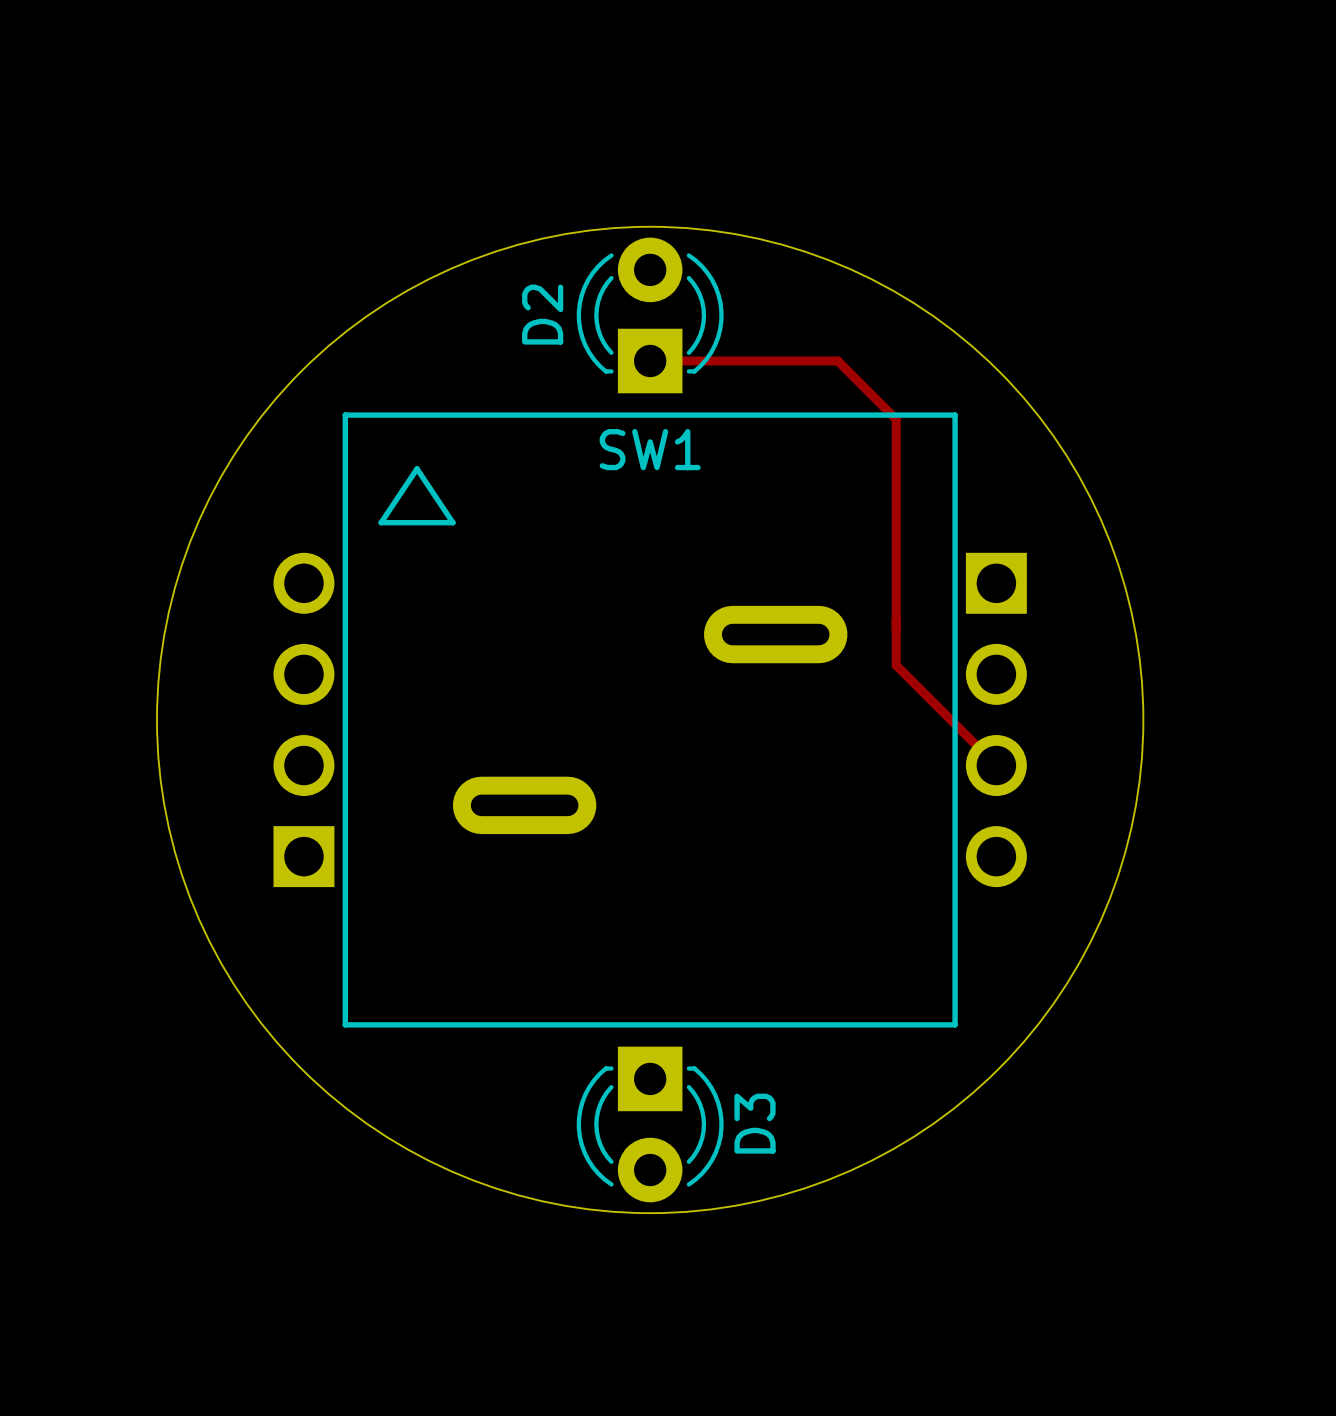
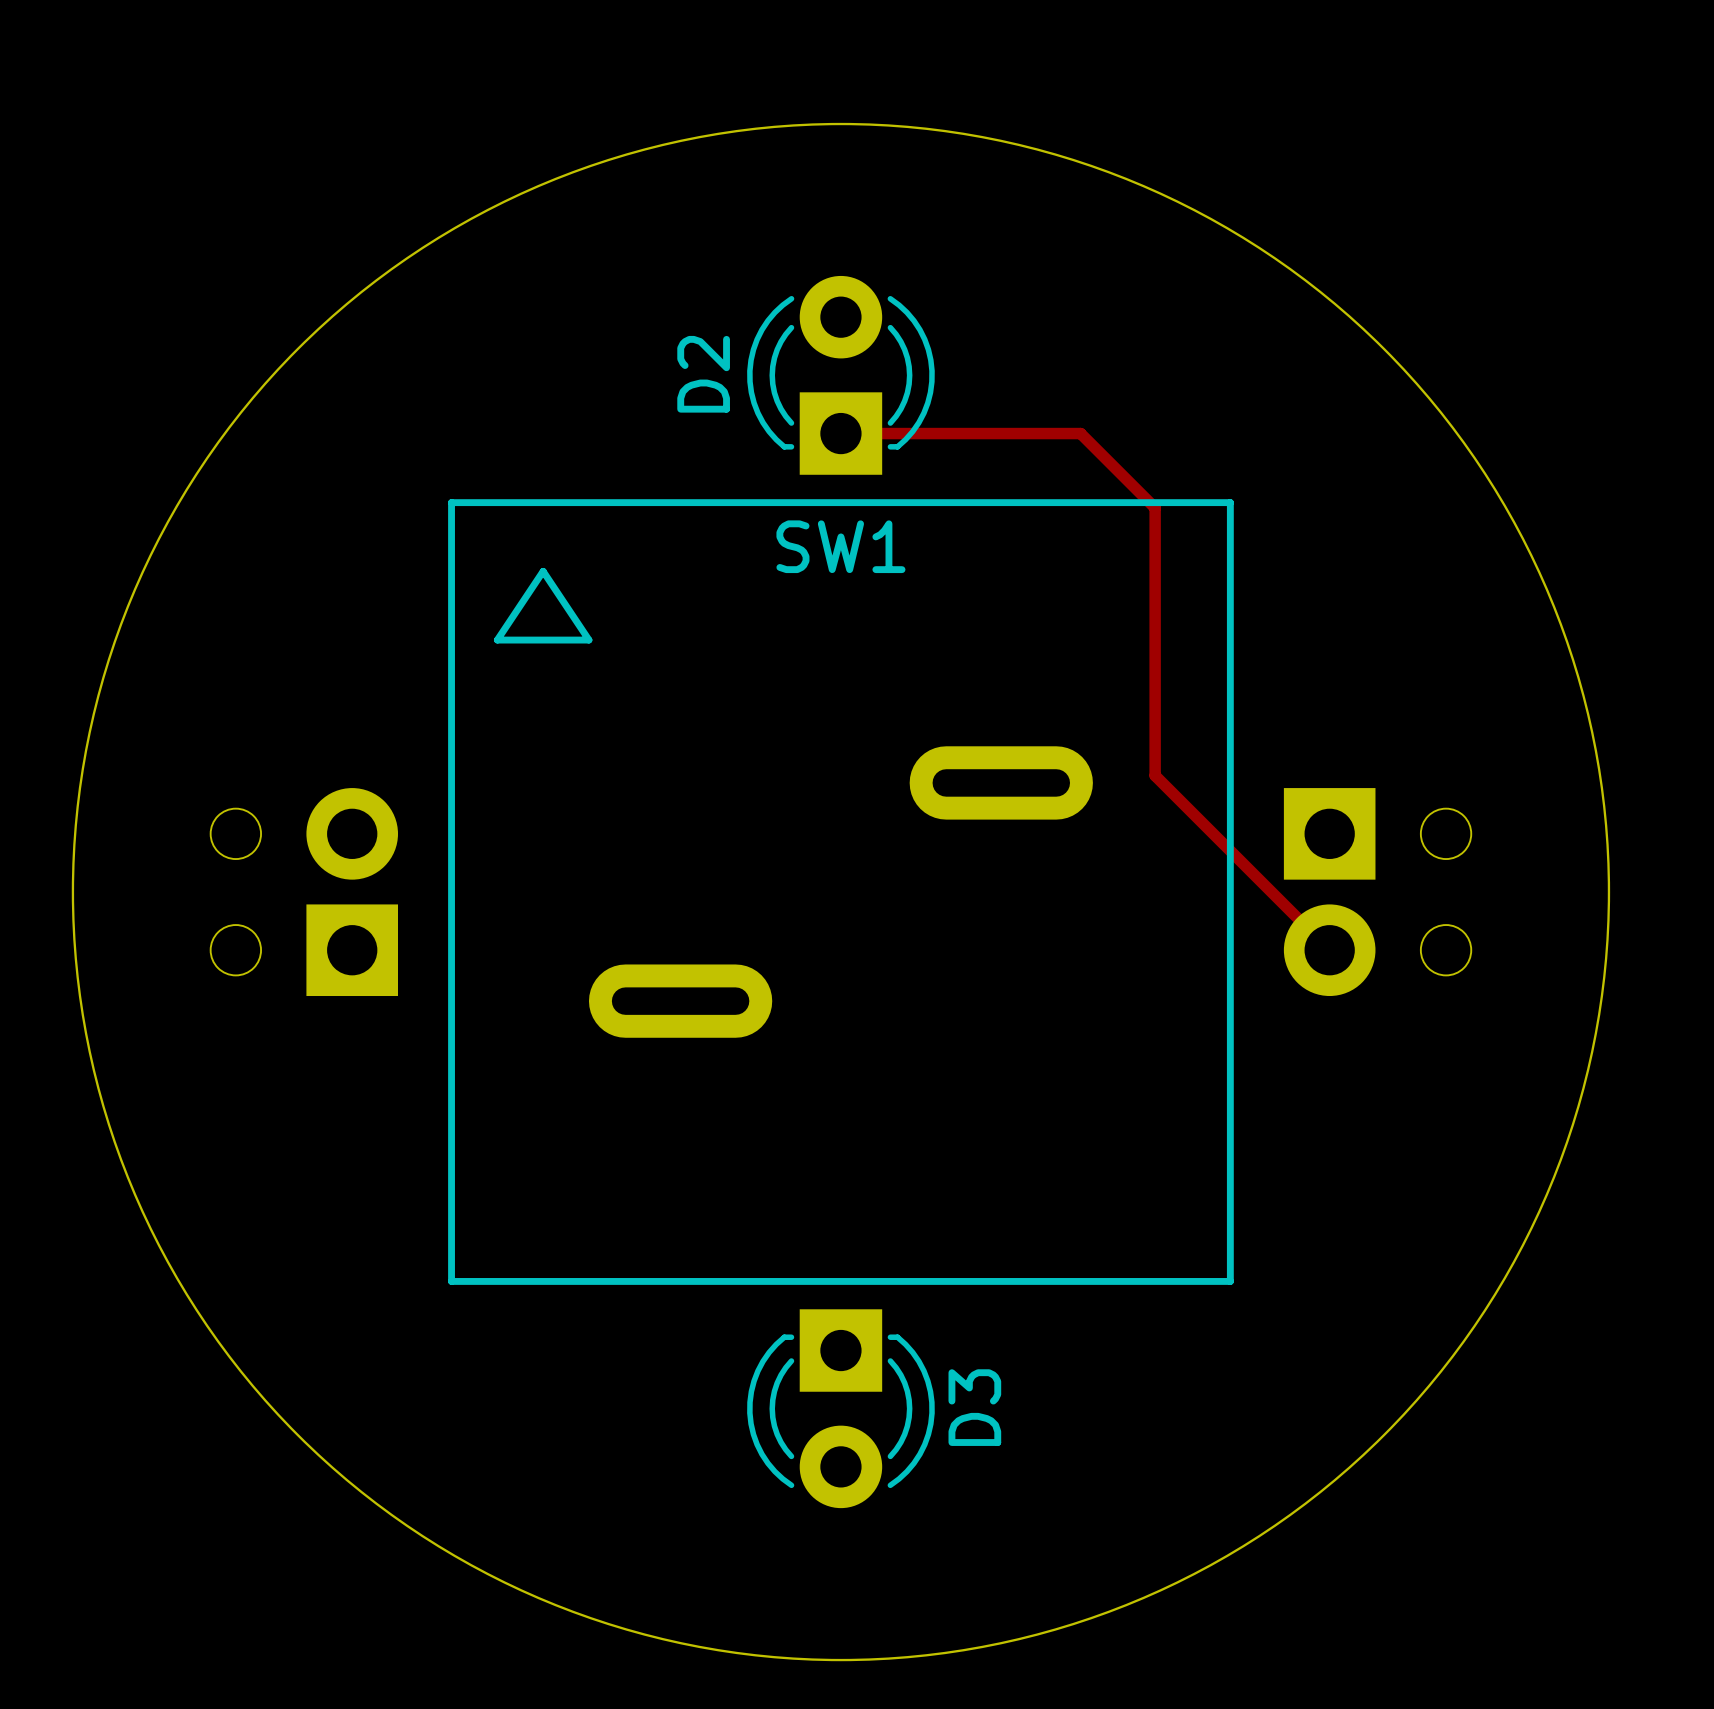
round board edge size: [156, 225, 1145, 1215] -> [71, 122, 1611, 1662]
track: (896, 628) (896, 665) (996, 765) -> (1155, 775) (1329, 950)
part: none -> (304, 892)
part: (303, 719) -> none
part: (996, 719) -> none
part: none -> (1377, 892)

